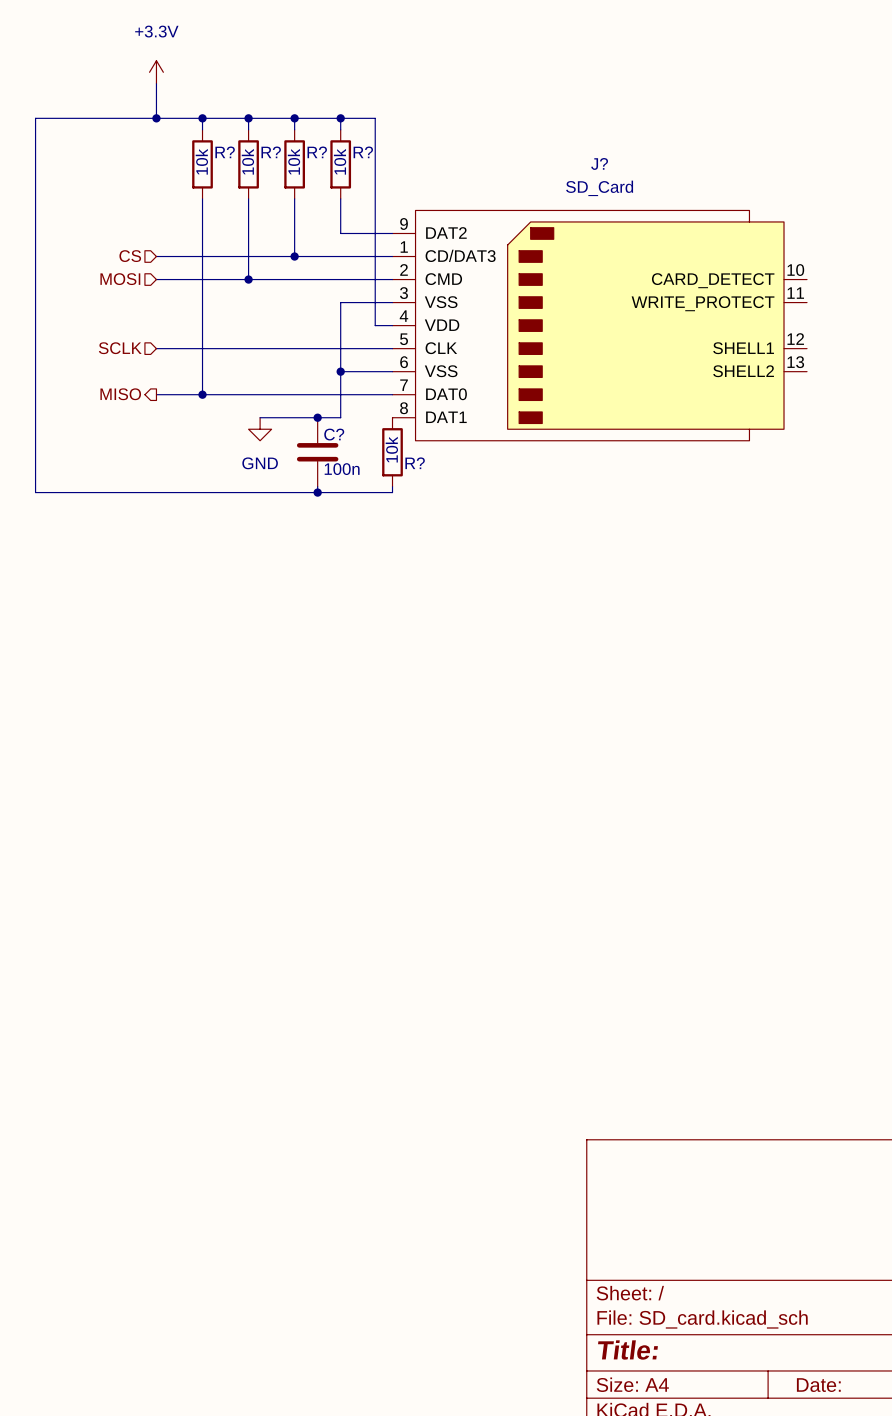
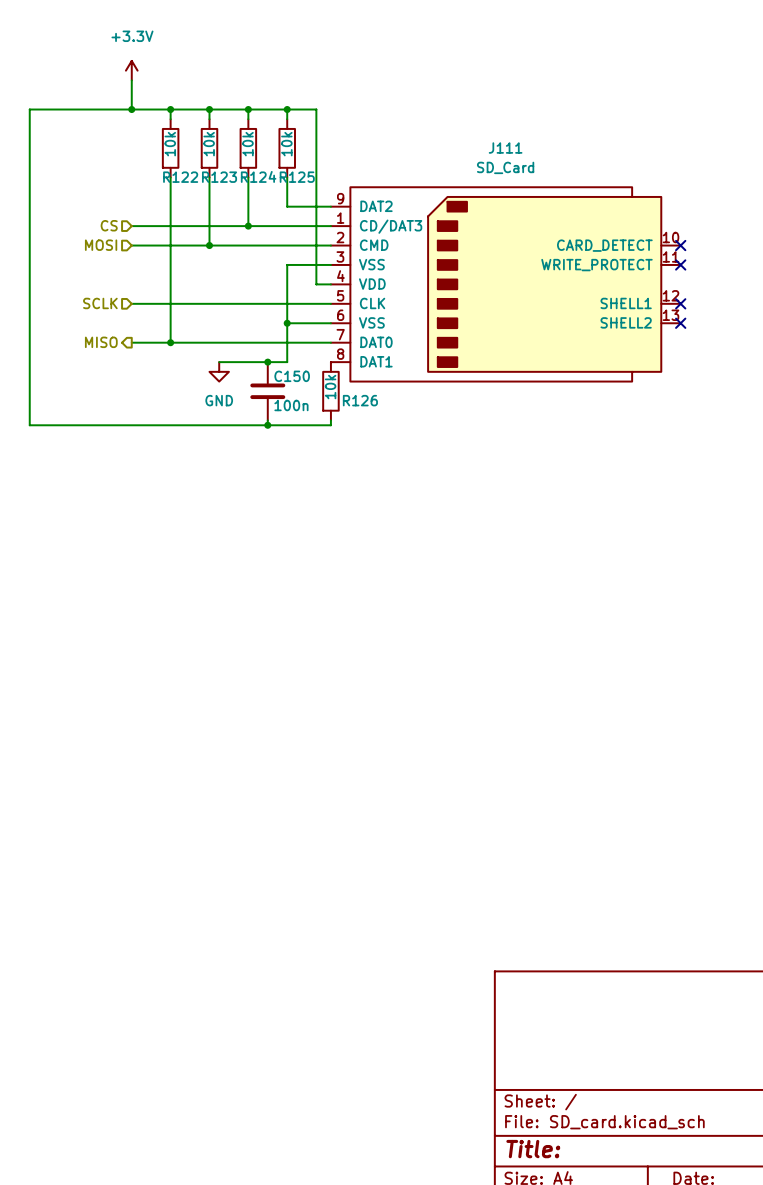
R? name: R? (225, 152) -> R122 (180, 177)
R? name: R? (271, 152) -> R123 (219, 177)
R? name: R? (317, 152) -> R124 (258, 176)
R? name: R? (363, 152) -> R125 (297, 177)
J? name: J? (599, 163) -> J111 (505, 148)
no-connect mark: none -> (680, 245)
no-connect mark: none -> (680, 264)
no-connect mark: none -> (680, 303)
no-connect mark: none -> (680, 323)
C? name: C? (334, 434) -> C150 (292, 376)
R? name: R? (415, 463) -> R126 (360, 400)

